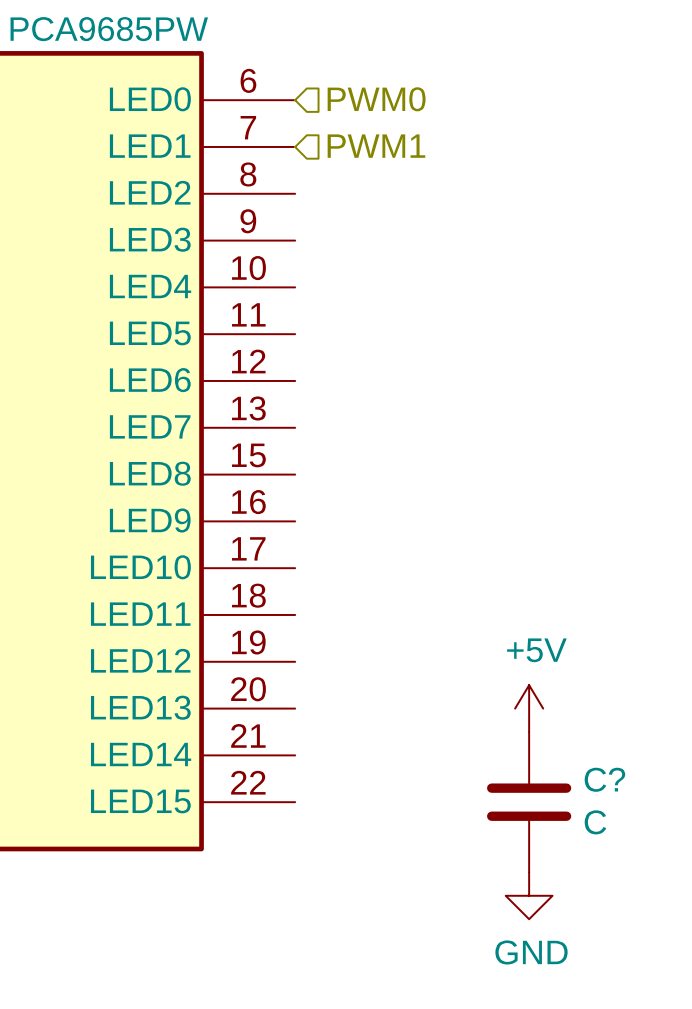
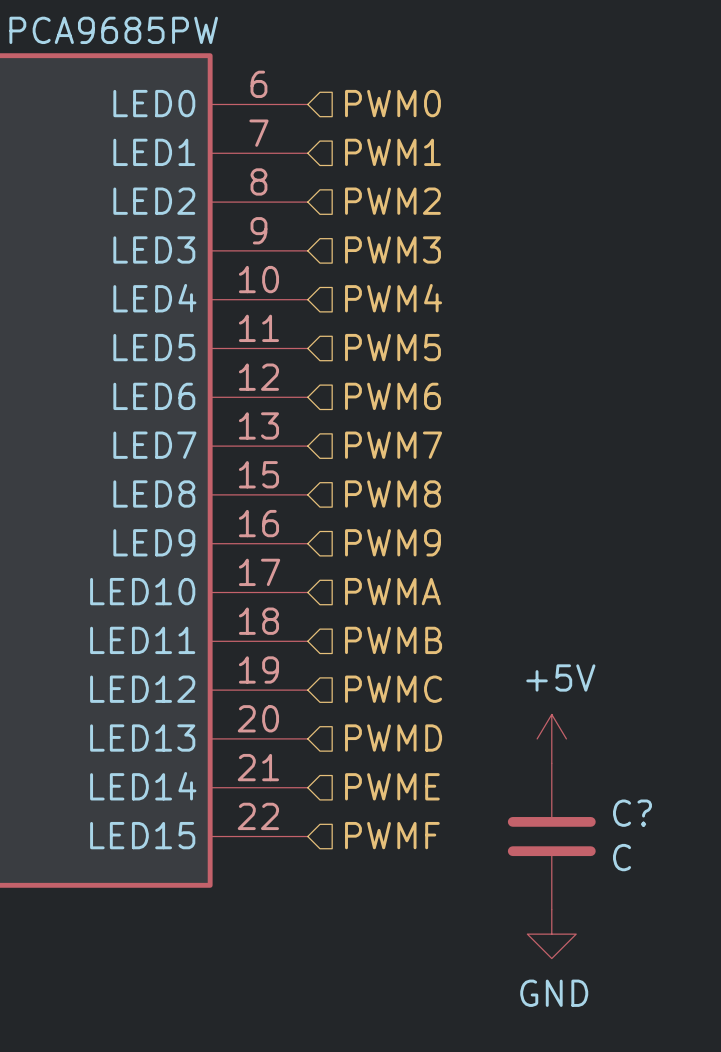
hierarchical label: none -> PWM2 (392, 201)
hierarchical label: none -> PWM3 (392, 249)
hierarchical label: none -> PWM4 (393, 298)
hierarchical label: none -> PWM5 (392, 347)
hierarchical label: none -> PWM6 (392, 396)
hierarchical label: none -> PWM7 (393, 445)
hierarchical label: none -> PWM8 (392, 493)
hierarchical label: none -> PWM9 (392, 542)
hierarchical label: none -> PWMA (392, 591)
hierarchical label: none -> PWMB (393, 640)
hierarchical label: none -> PWMC (393, 689)
hierarchical label: none -> PWMD (393, 738)
hierarchical label: none -> PWME (392, 786)
hierarchical label: none -> PWMF (392, 835)

